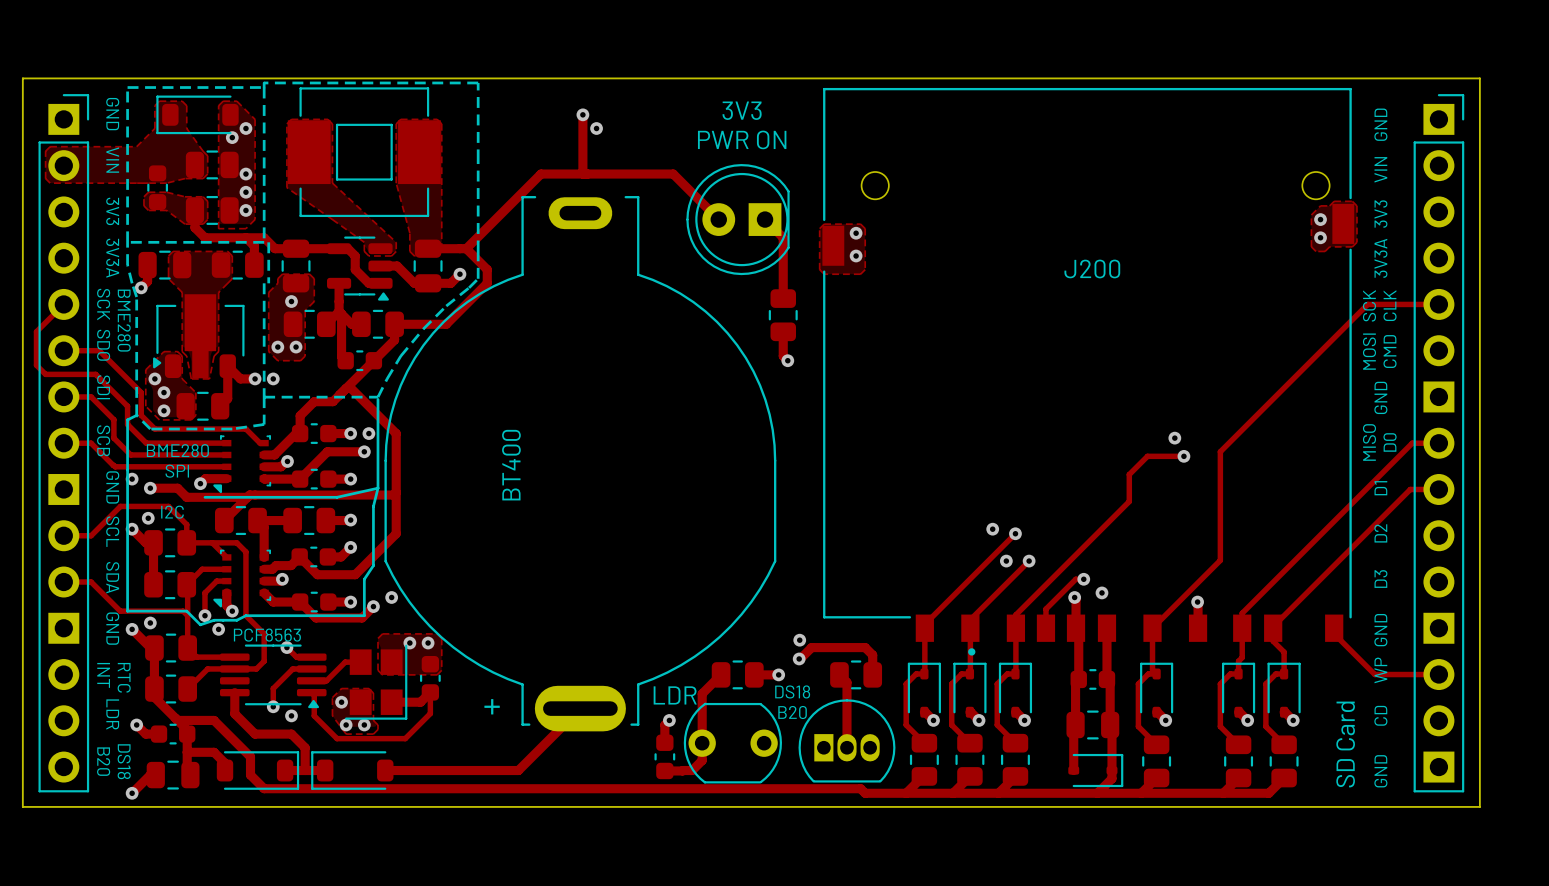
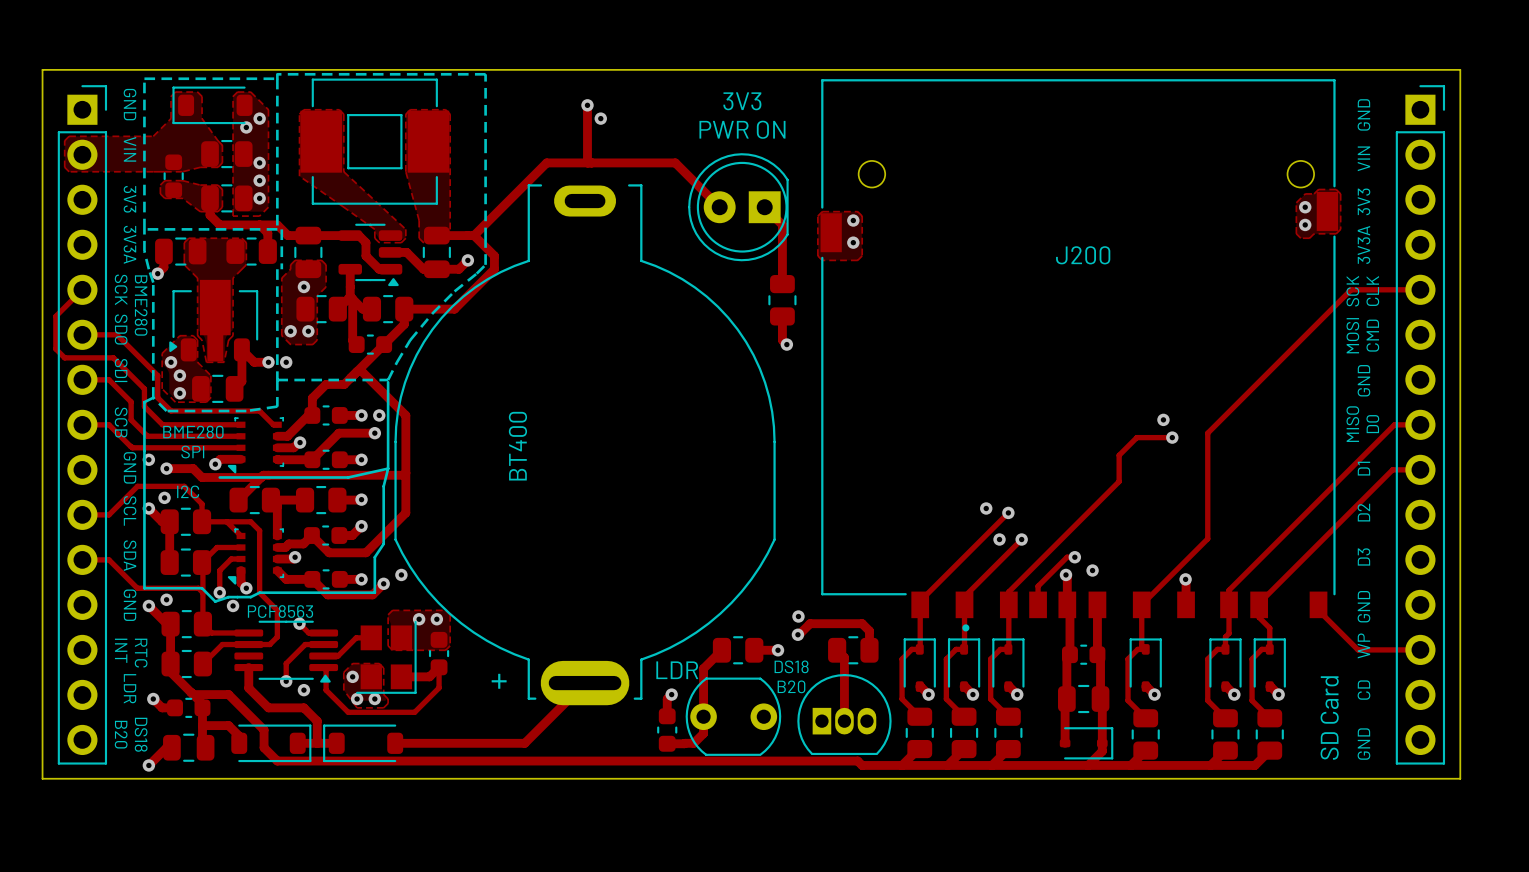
part footprint: [38, 94, 90, 793] -> [57, 85, 108, 765]
part footprint: [1413, 94, 1465, 793] -> [1395, 85, 1446, 765]

